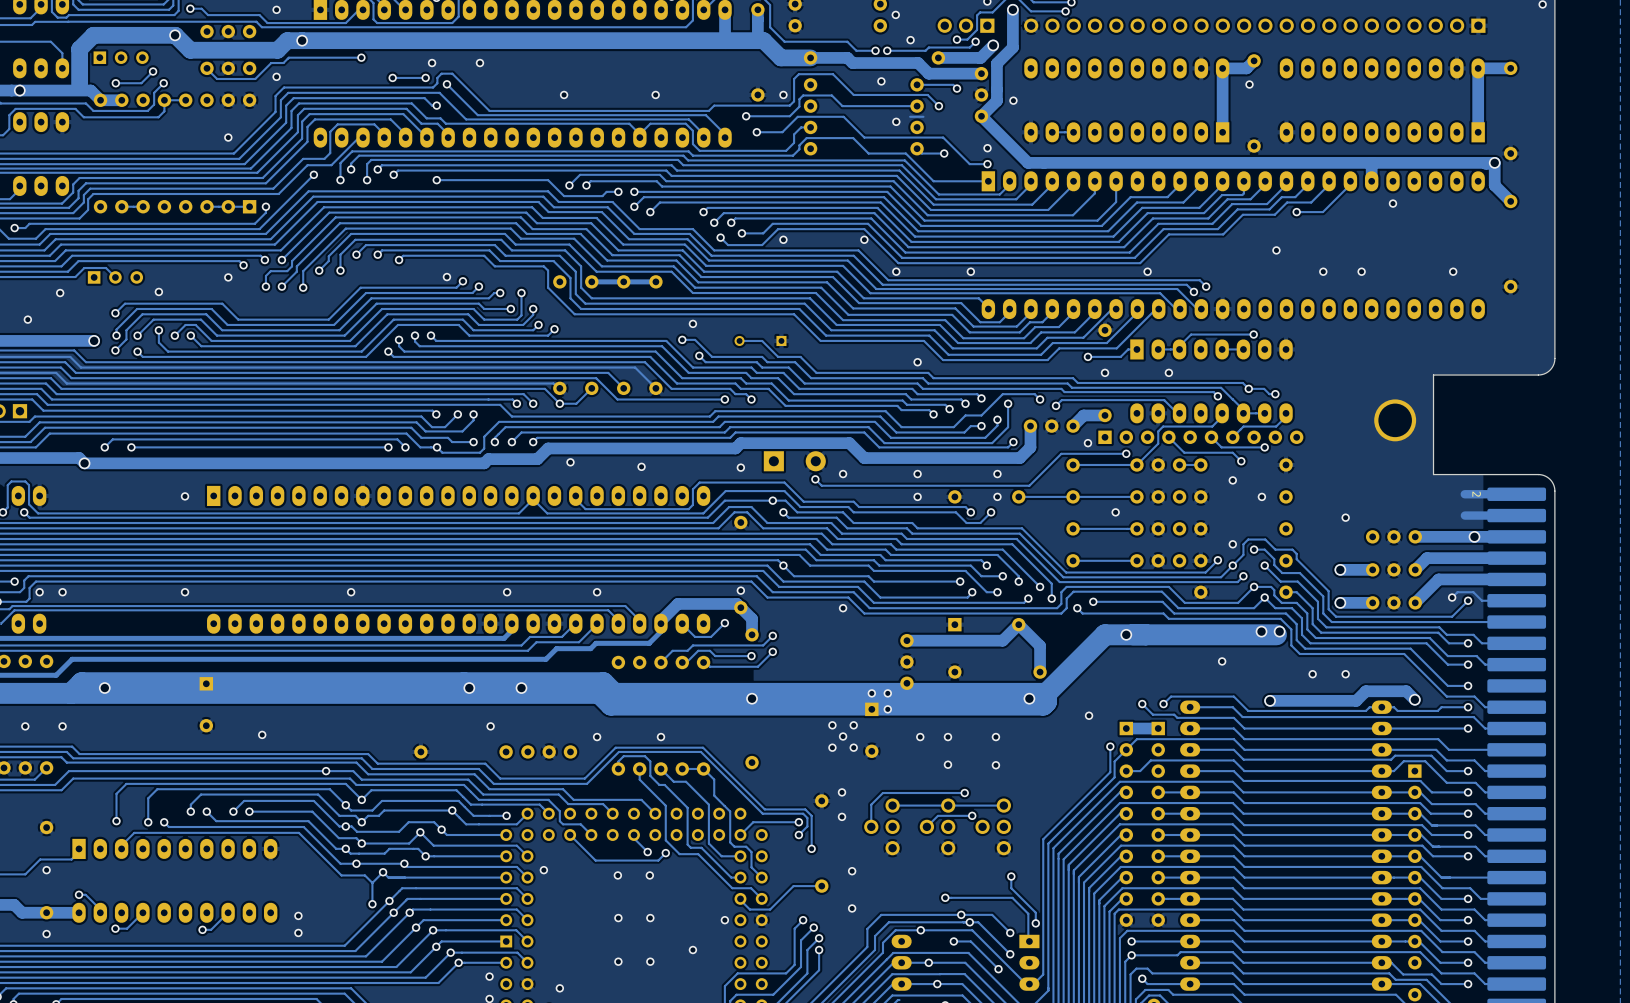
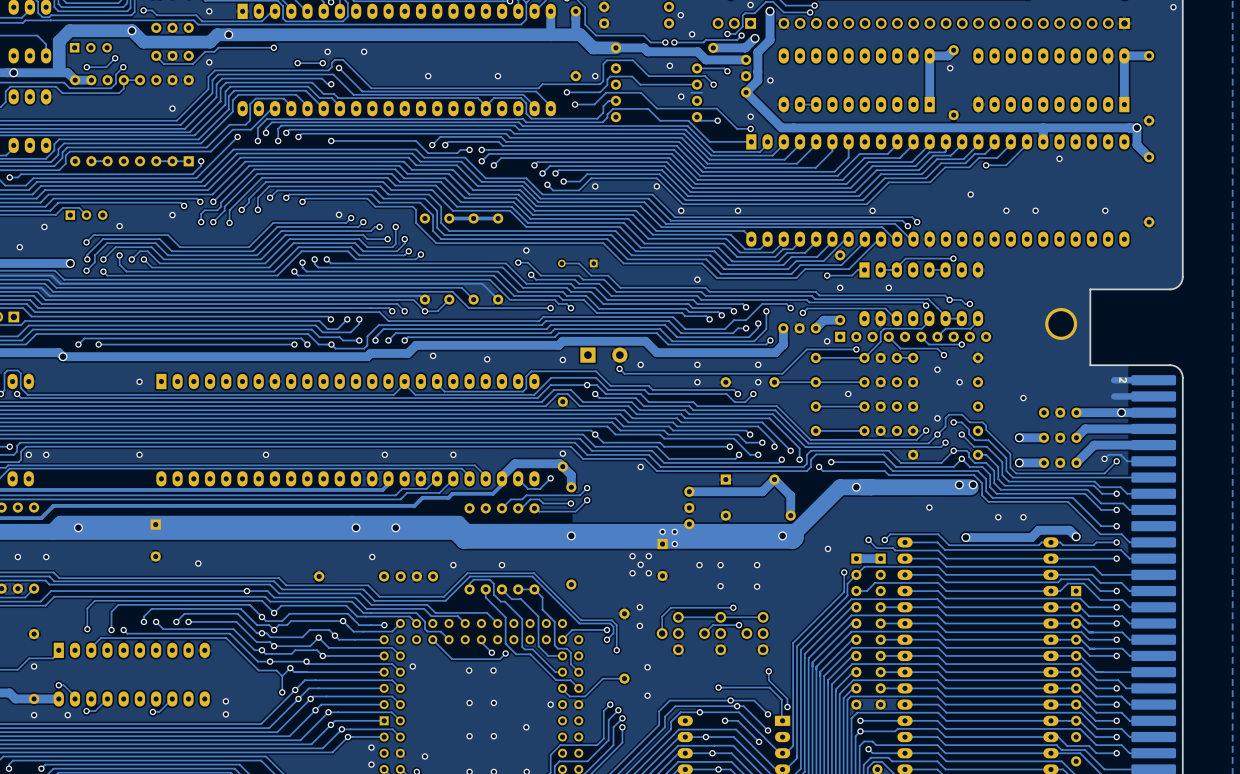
via: none -> (67, 715)

